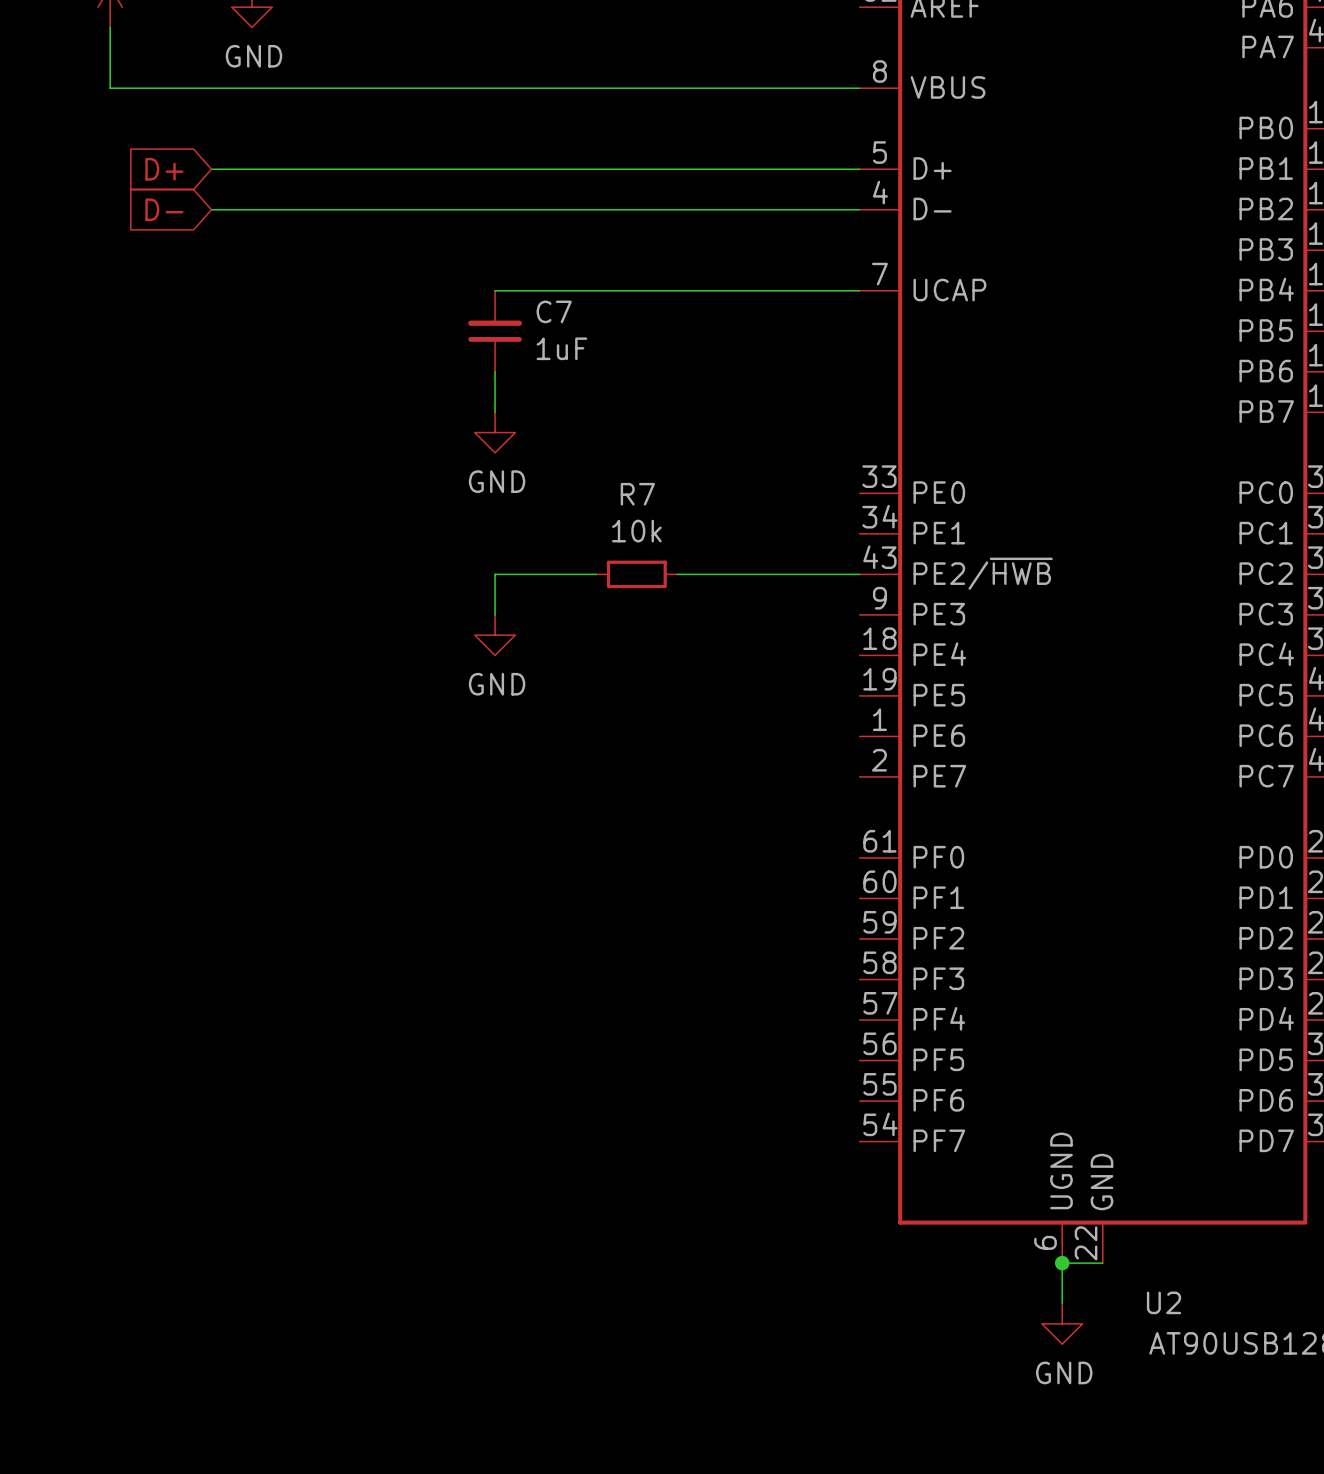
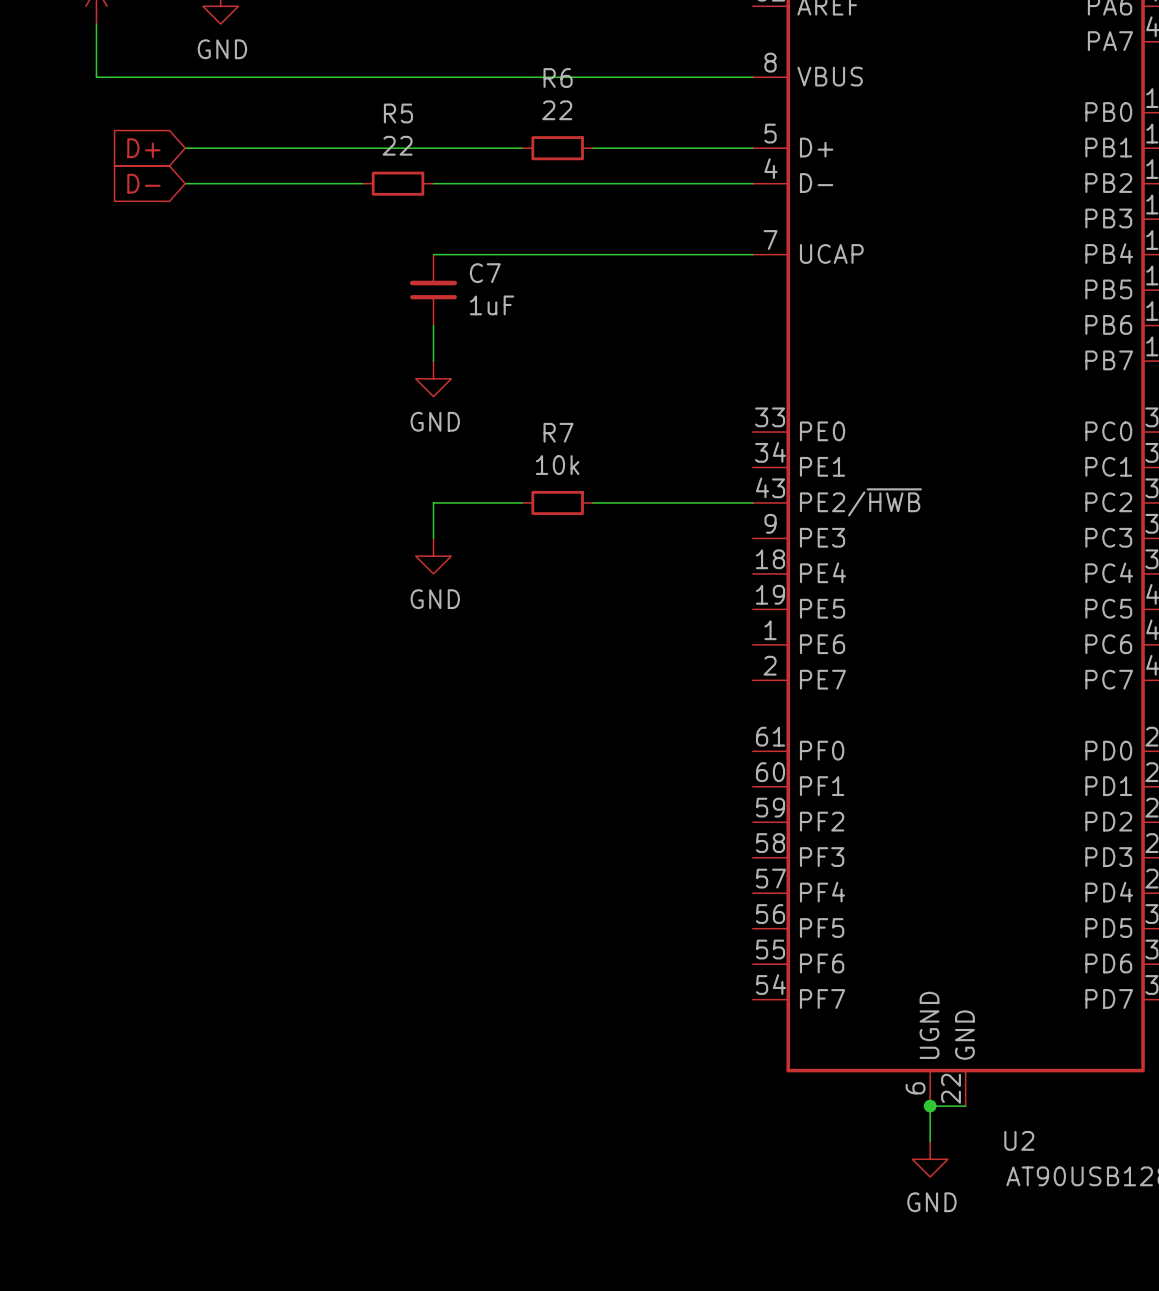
wire: (596, 169) (677, 169) -> none
R6: none -> 22 (557, 148)
wire: (414, 209) (495, 209) -> none
R5: none -> 22 (398, 183)

